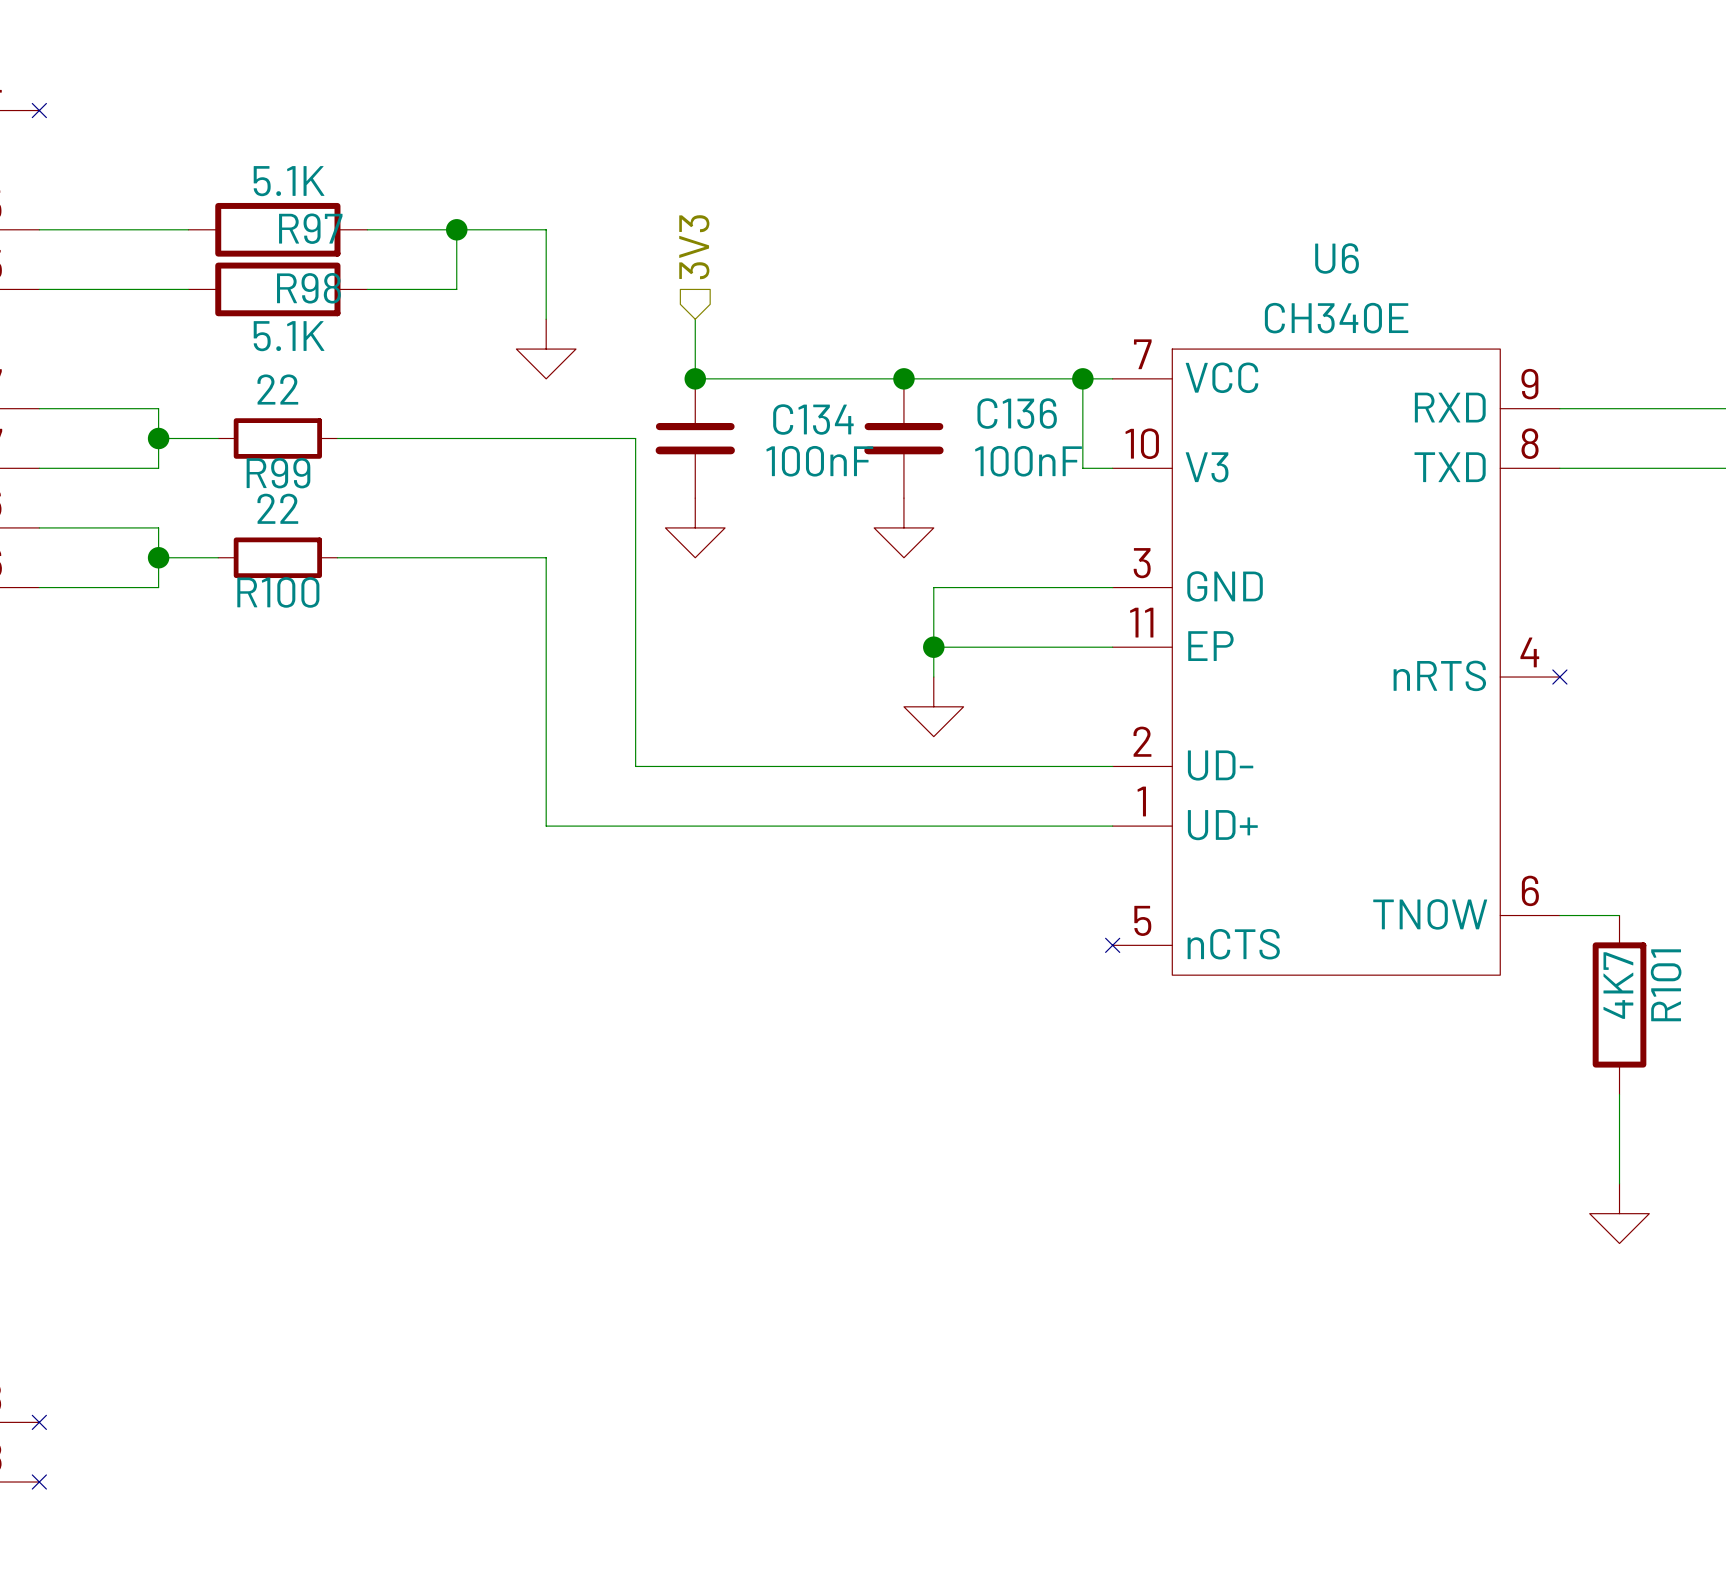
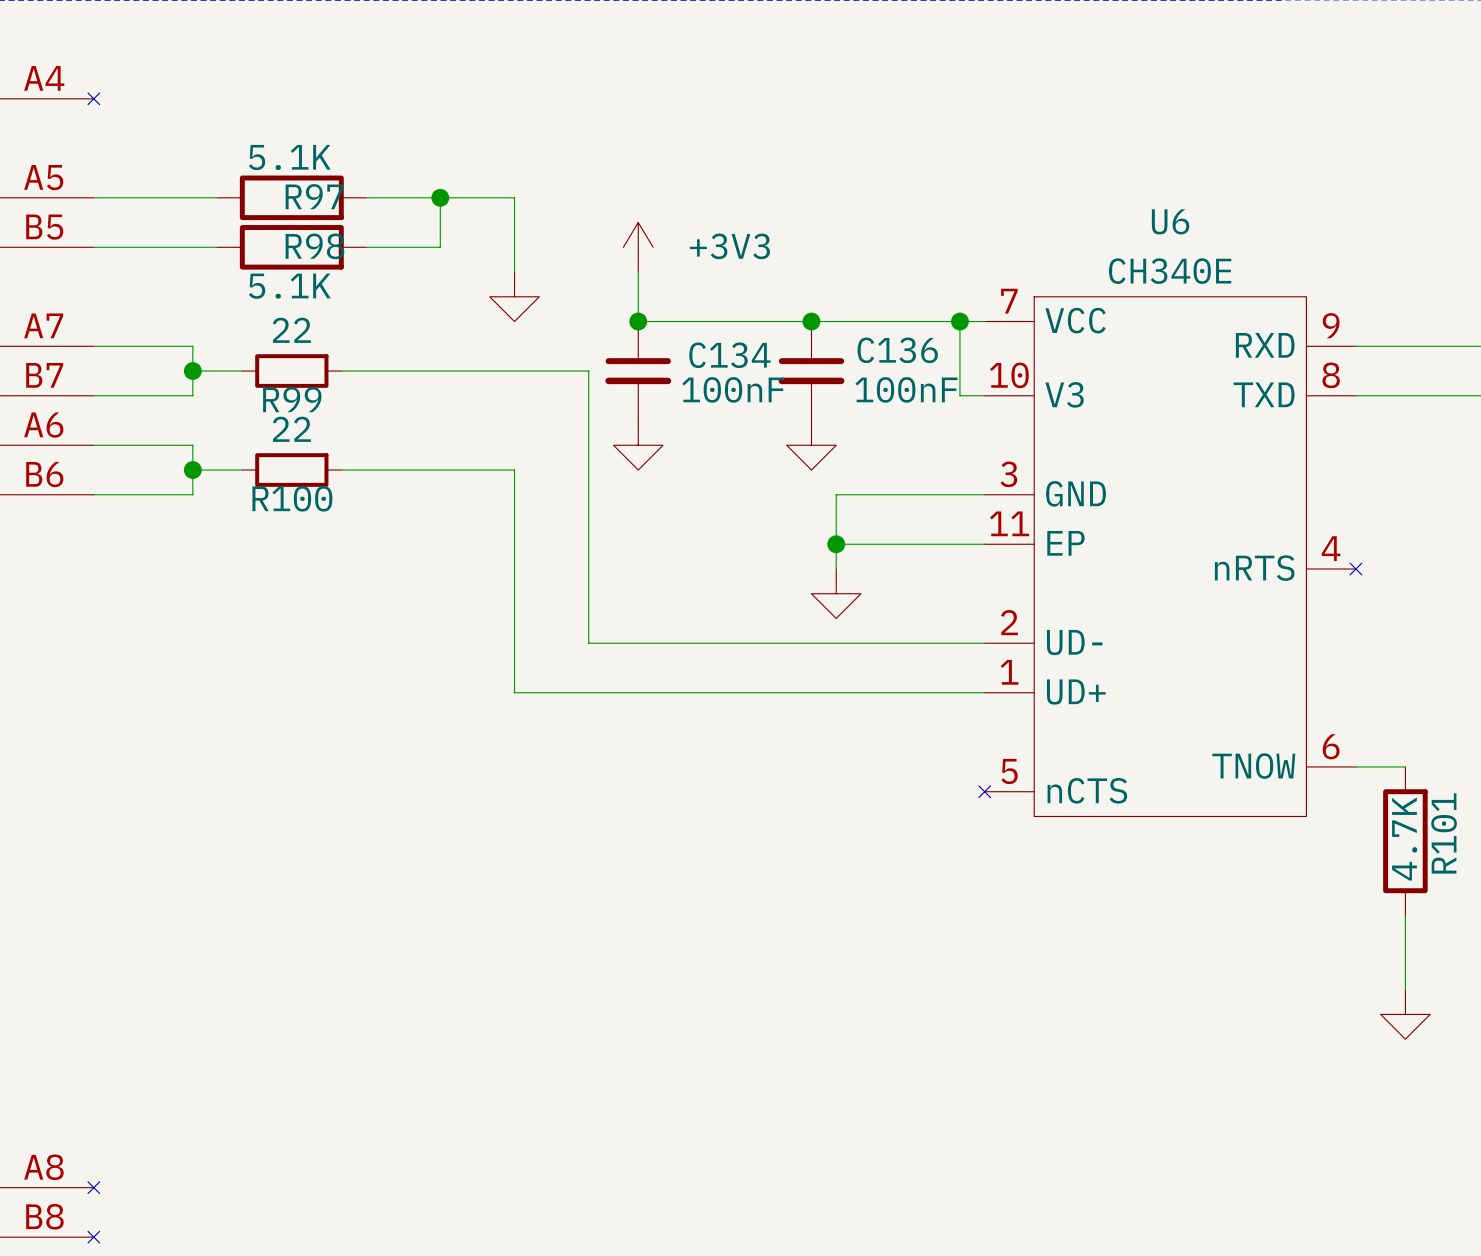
hierarchical label: 3V3 (694, 247) -> none
power symbol: none -> +3V3 (638, 247)
R101 value: 4K7 (1618, 985) -> 4.7K (1404, 838)

